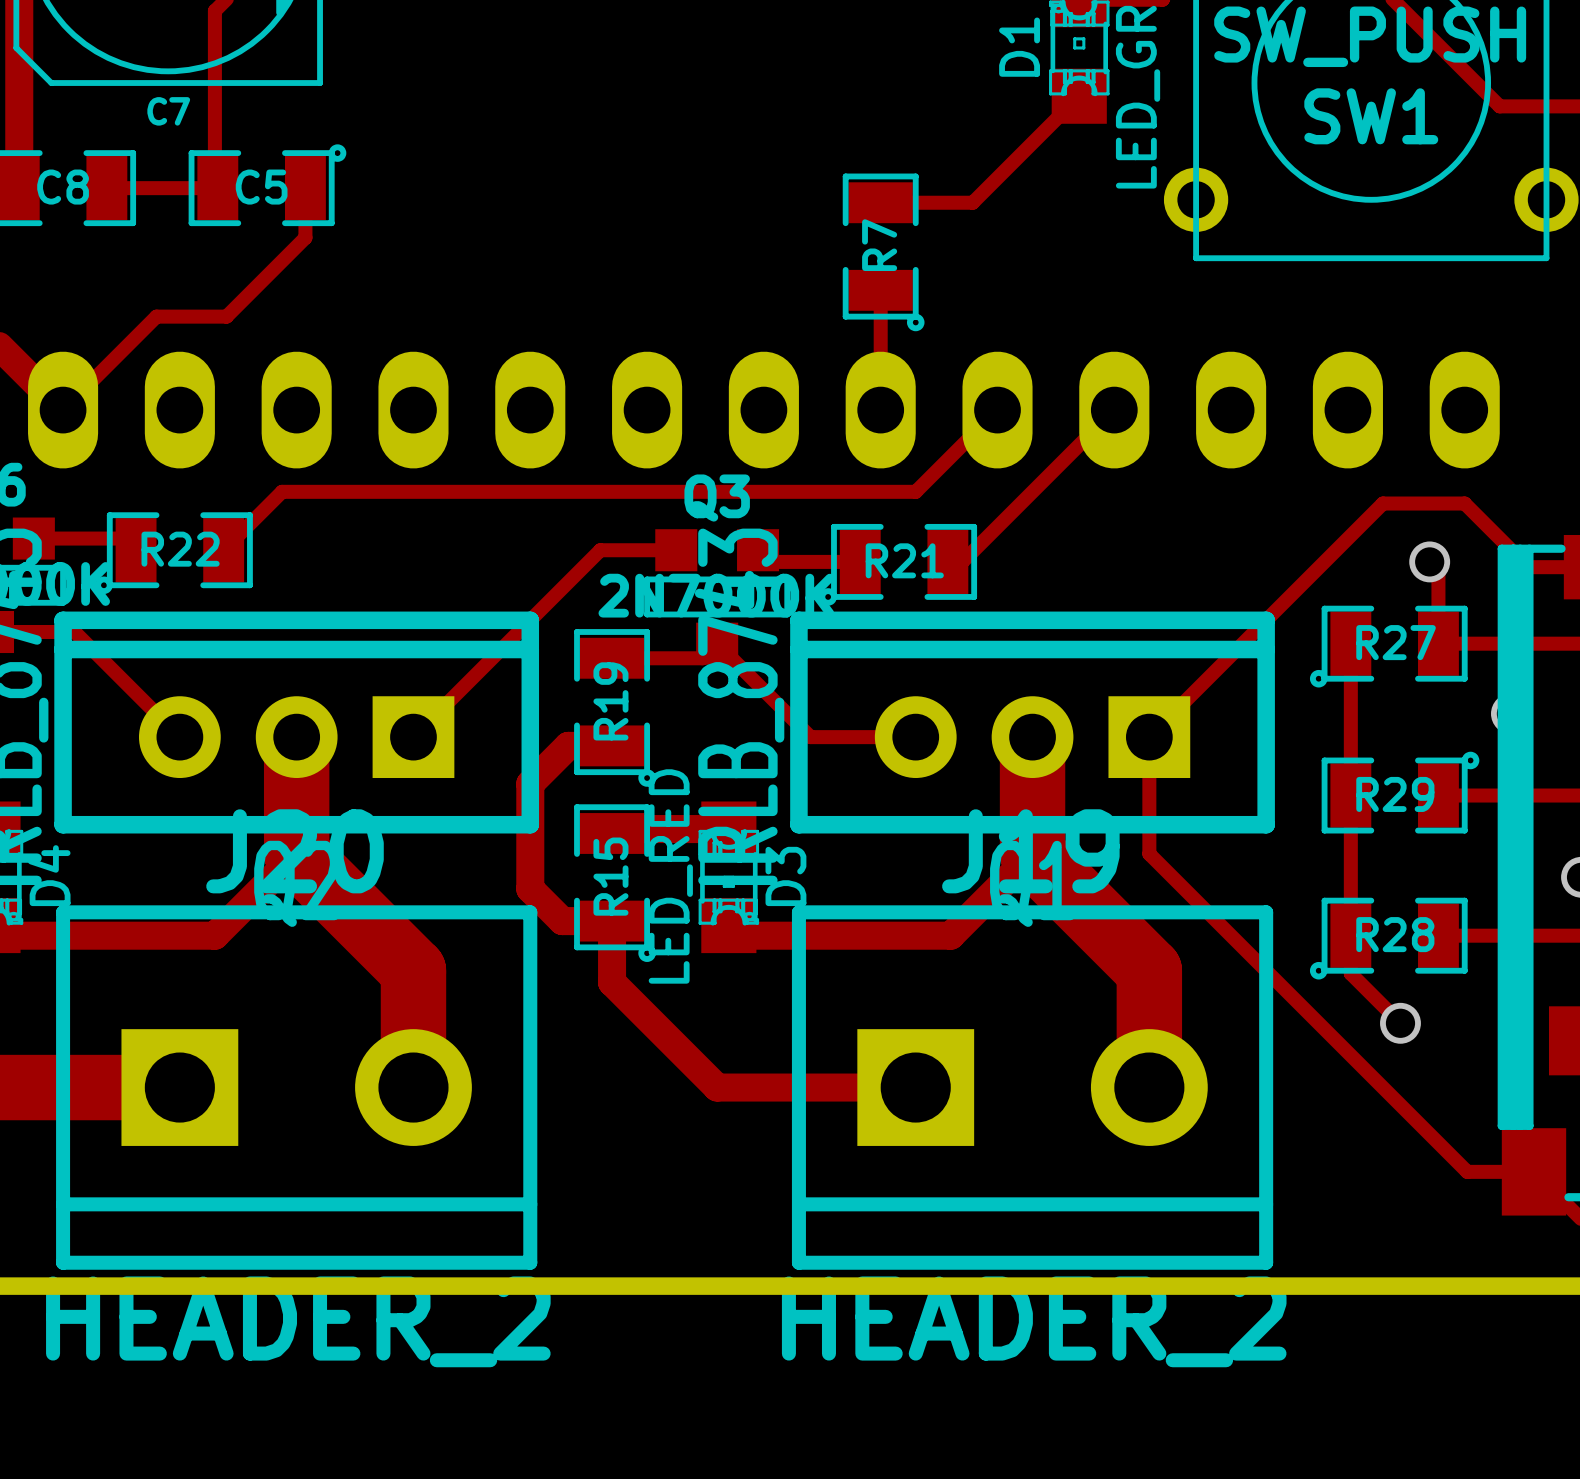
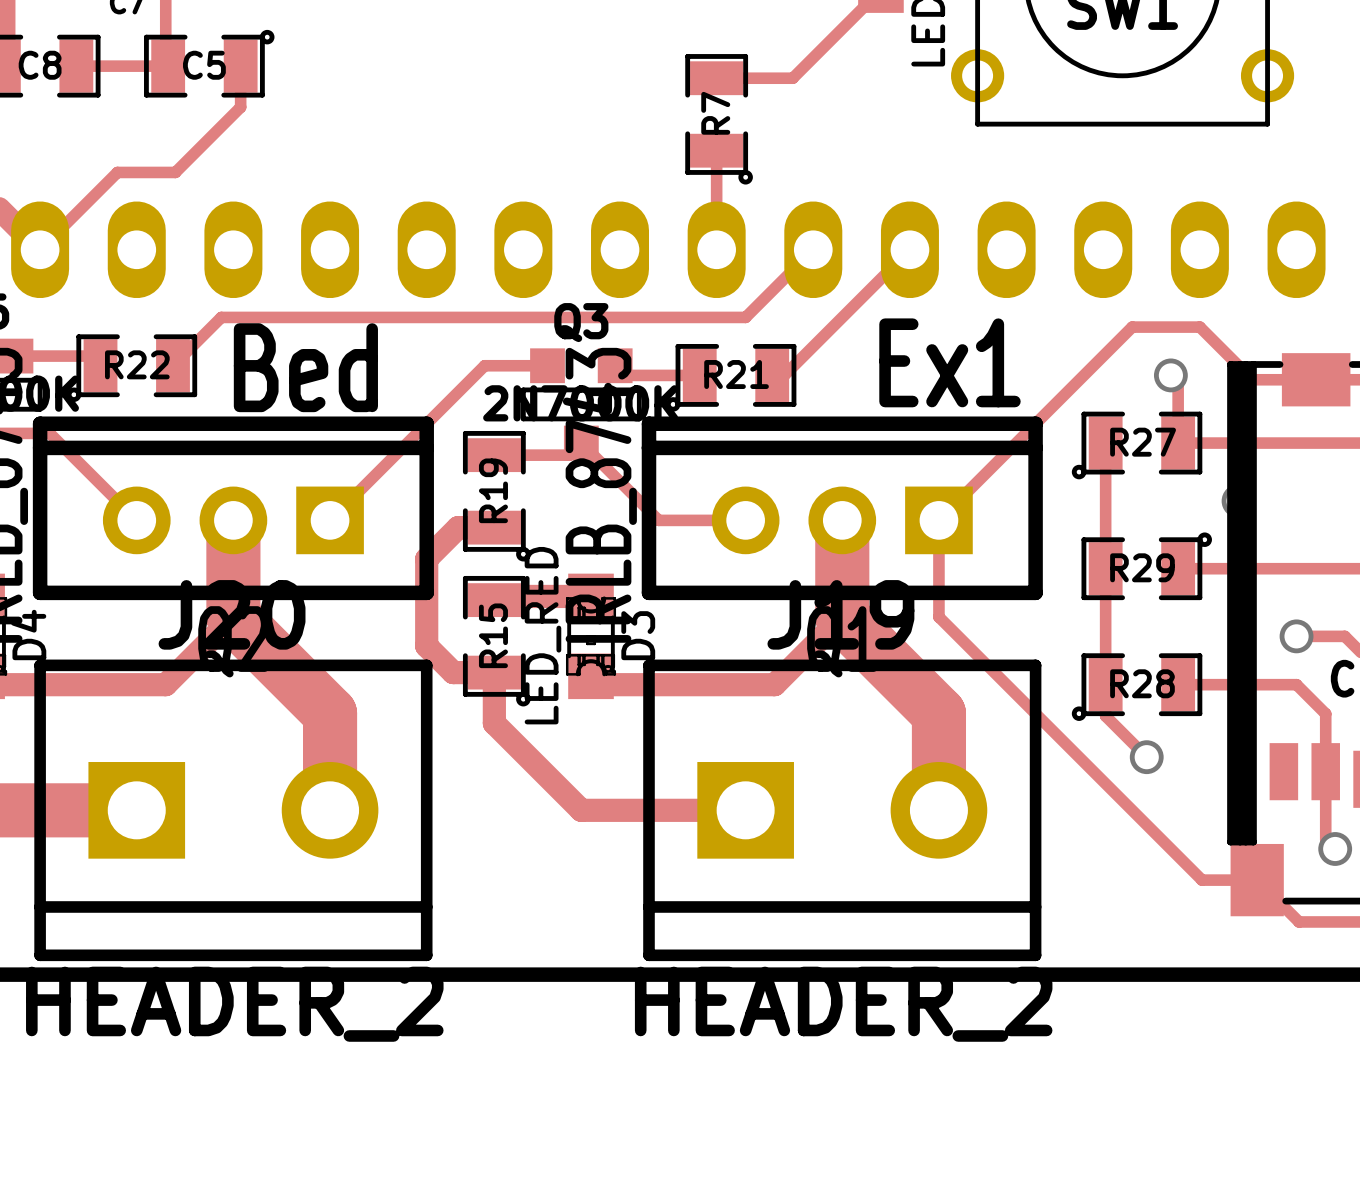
text: none -> Ex1 (949, 362)
text: none -> Bed (305, 367)

